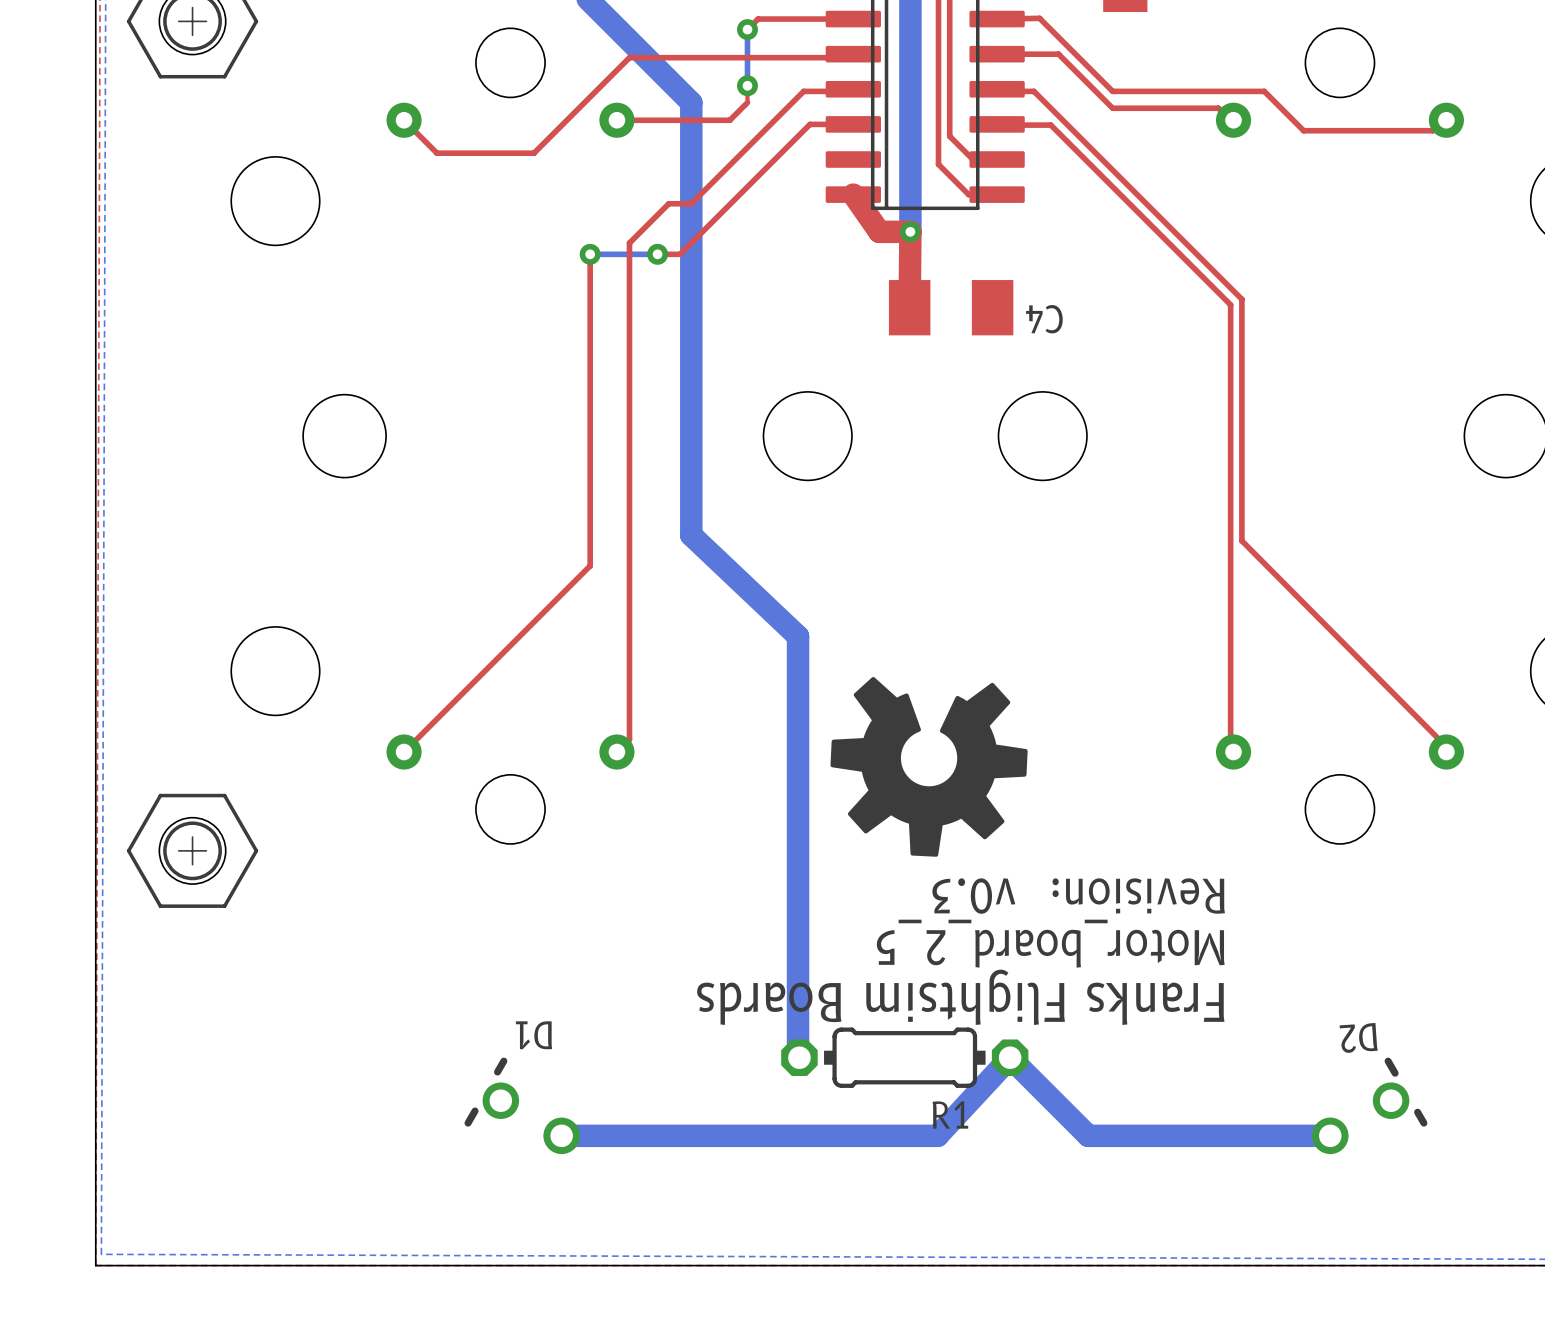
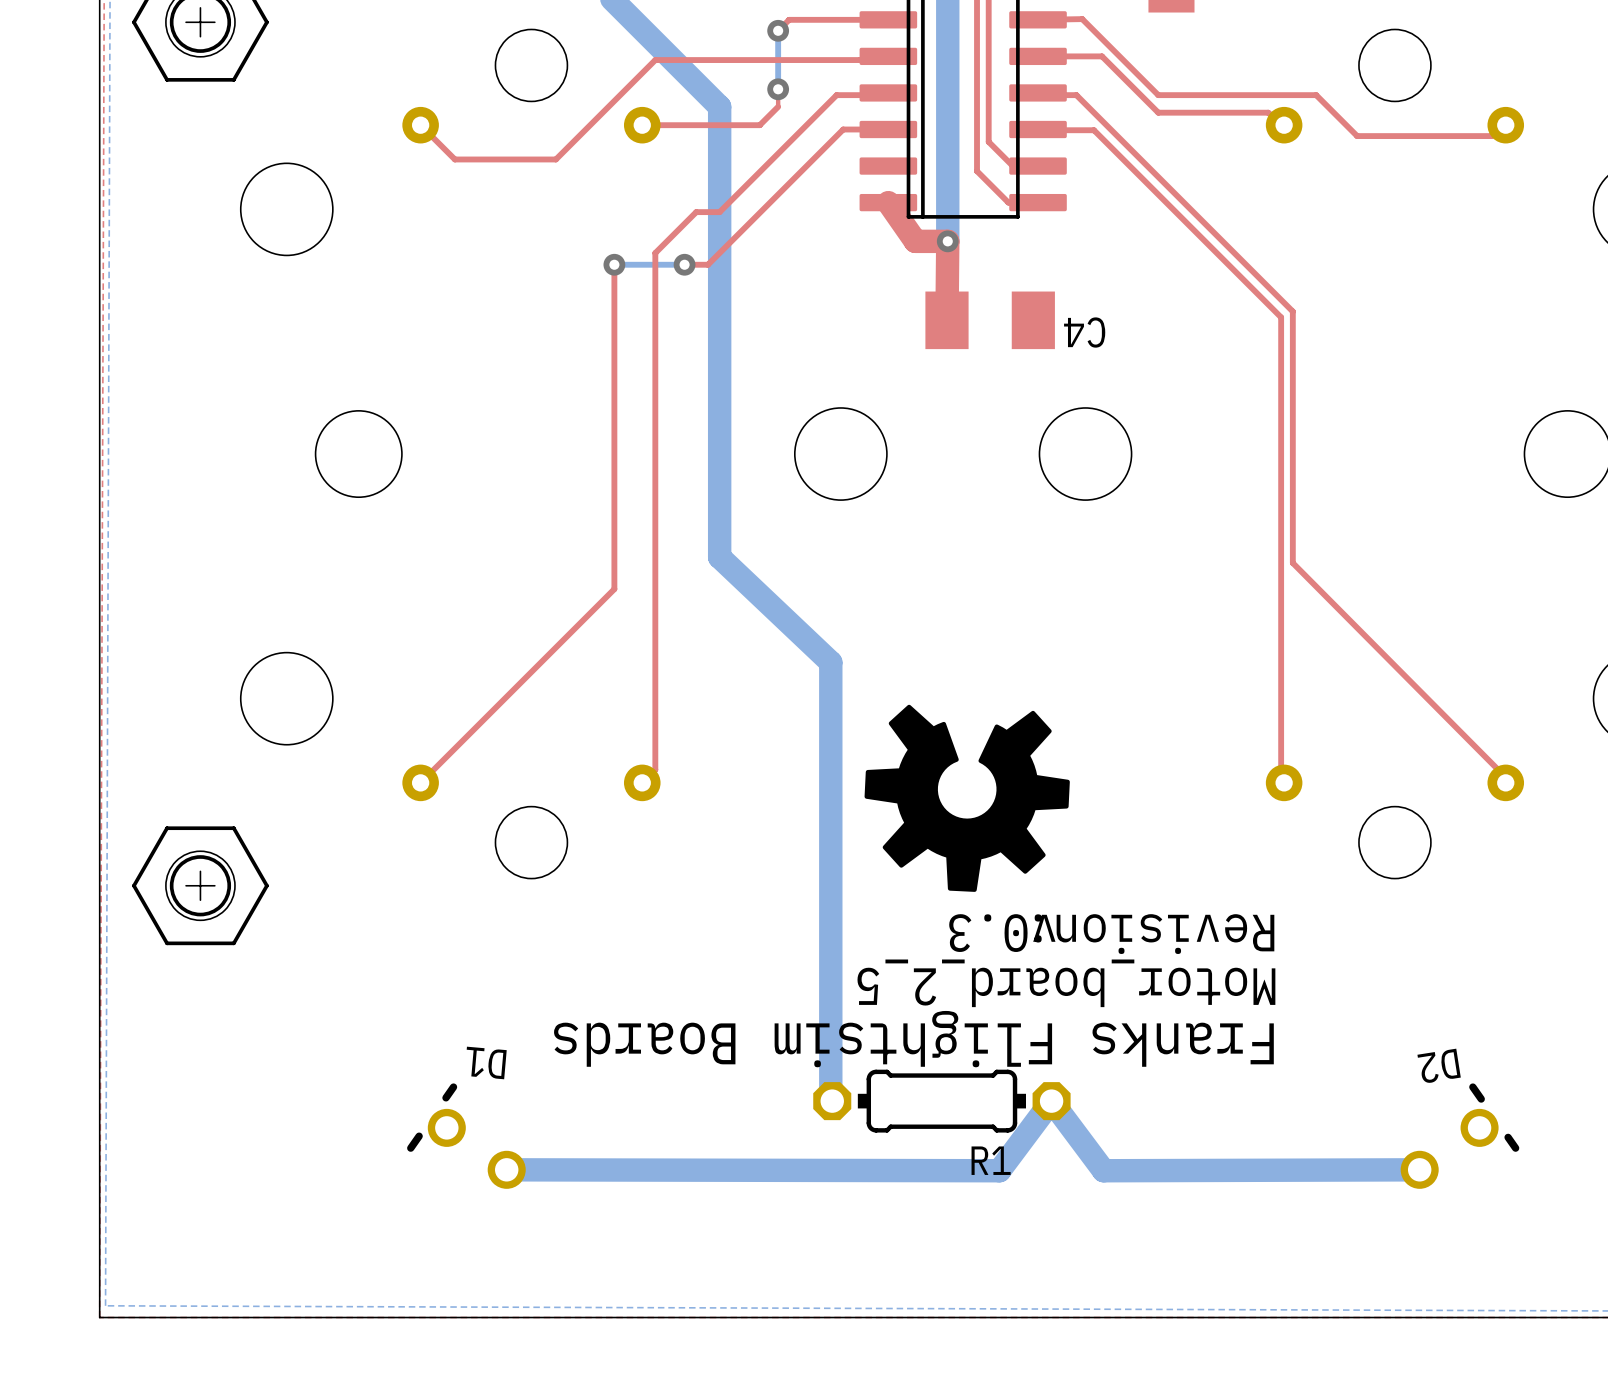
D1 rotation: 0° (522, 1105) -> 5° clockwise (466, 1136)
D1 position: (522, 1105) -> (466, 1136)
D2 rotation: 0° (1369, 1105) -> 5° counterclockwise (1459, 1136)
bottom track: none -> (506, 1169) (999, 1170) (1051, 1101) (1103, 1170) (1419, 1169)
bottom track: (561, 1135) (937, 1135) (1010, 1057) (1088, 1135) (1330, 1135) -> none

